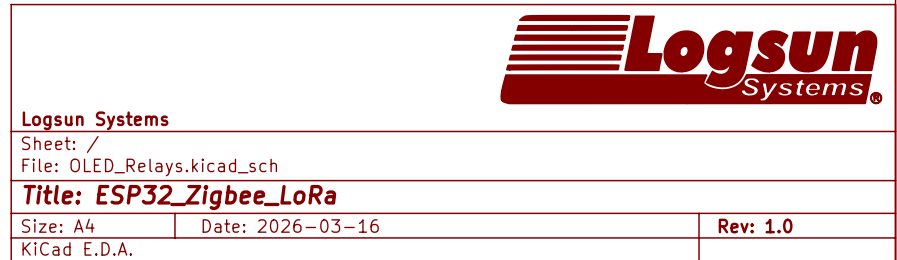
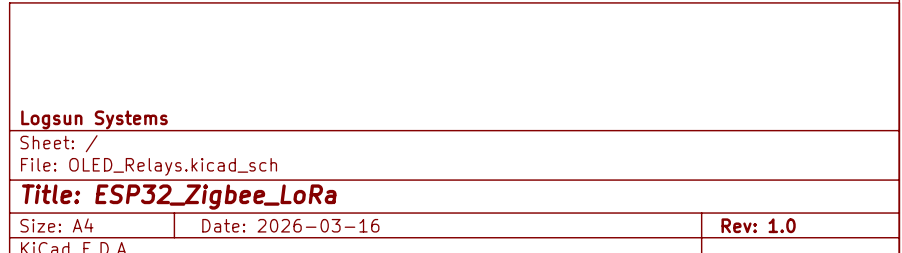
power symbol: (691, 59) -> none

